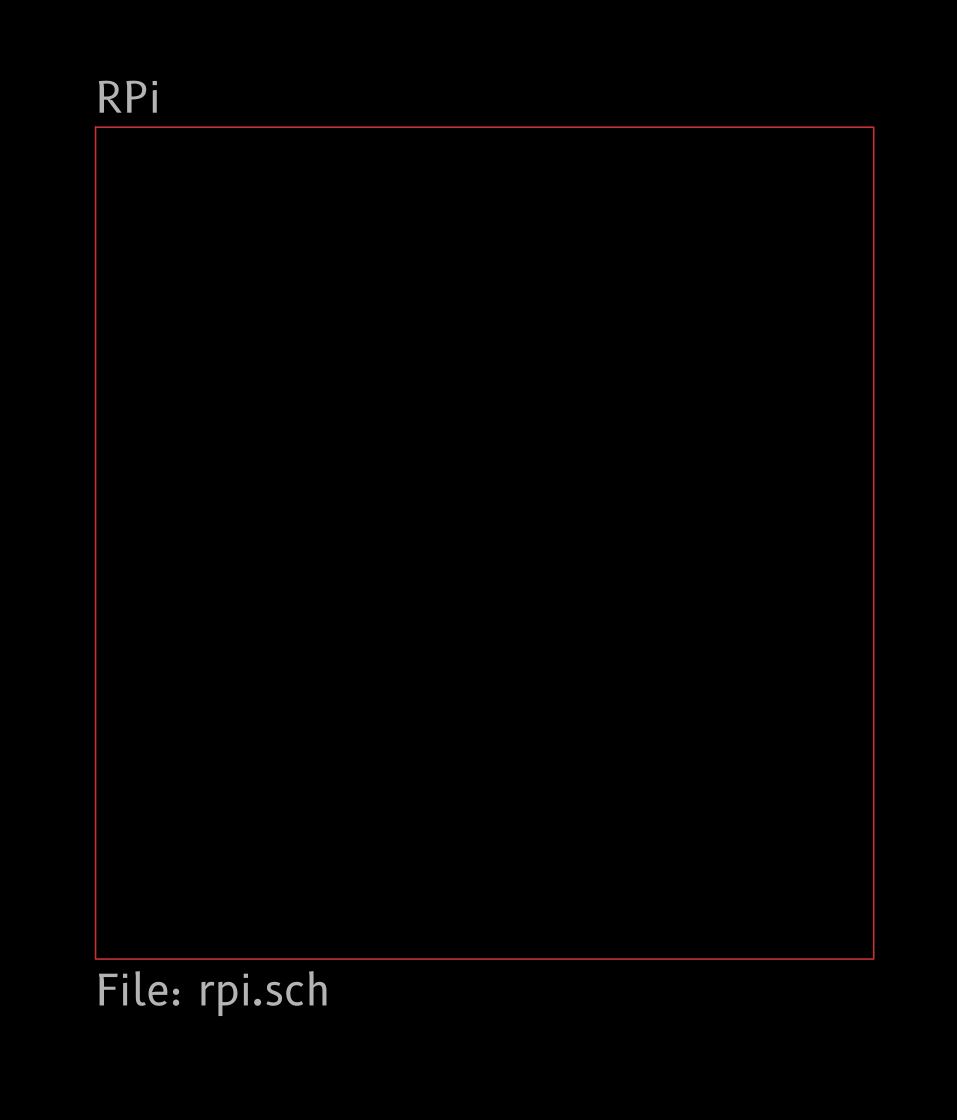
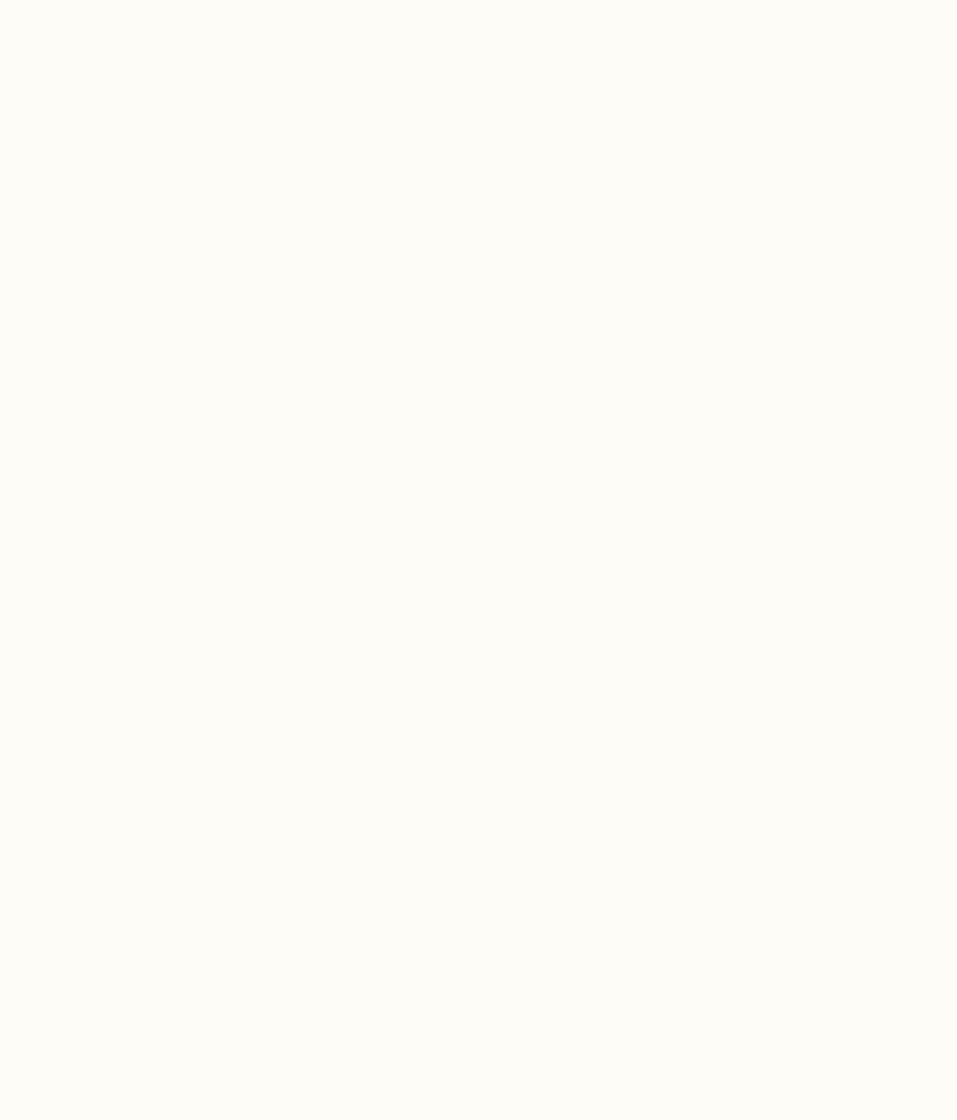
sheet RPi: File: rpi.sch (484, 543) -> none

